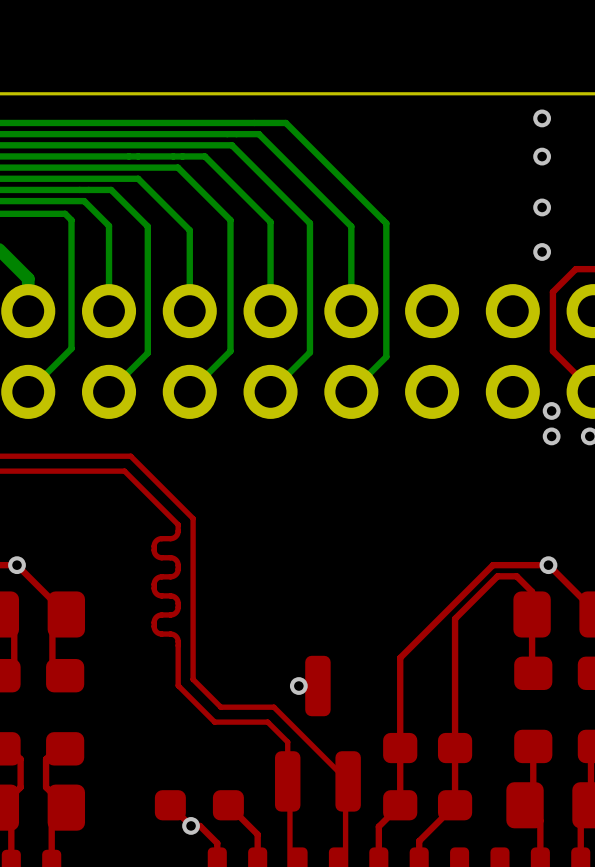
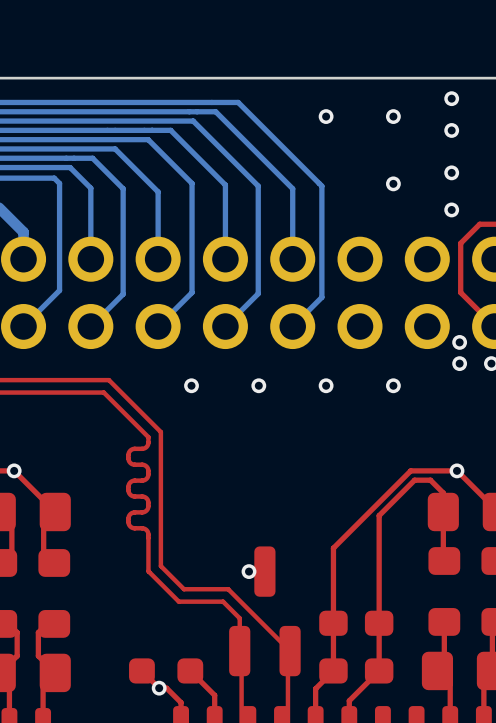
via: none -> (326, 116)
via: none -> (393, 116)
via: none -> (393, 183)
via: none -> (191, 385)
via: none -> (258, 385)
via: none -> (326, 385)
via: none -> (393, 385)

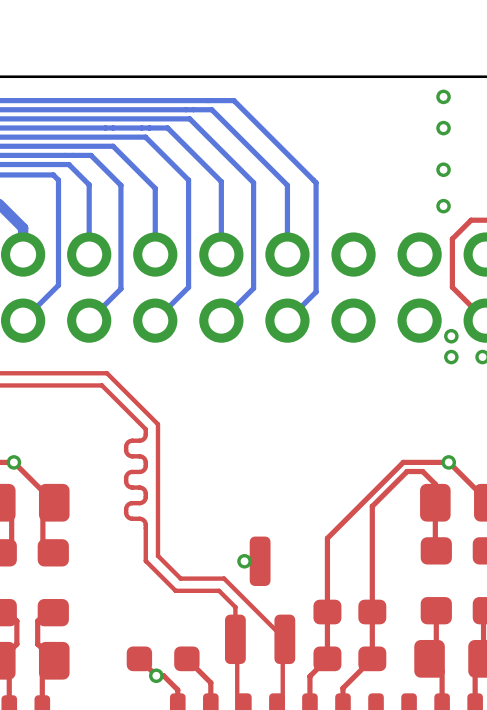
via: (326, 116) -> none
via: (393, 116) -> none
via: (393, 183) -> none
via: (191, 385) -> none
via: (258, 385) -> none
via: (326, 385) -> none
via: (393, 385) -> none

